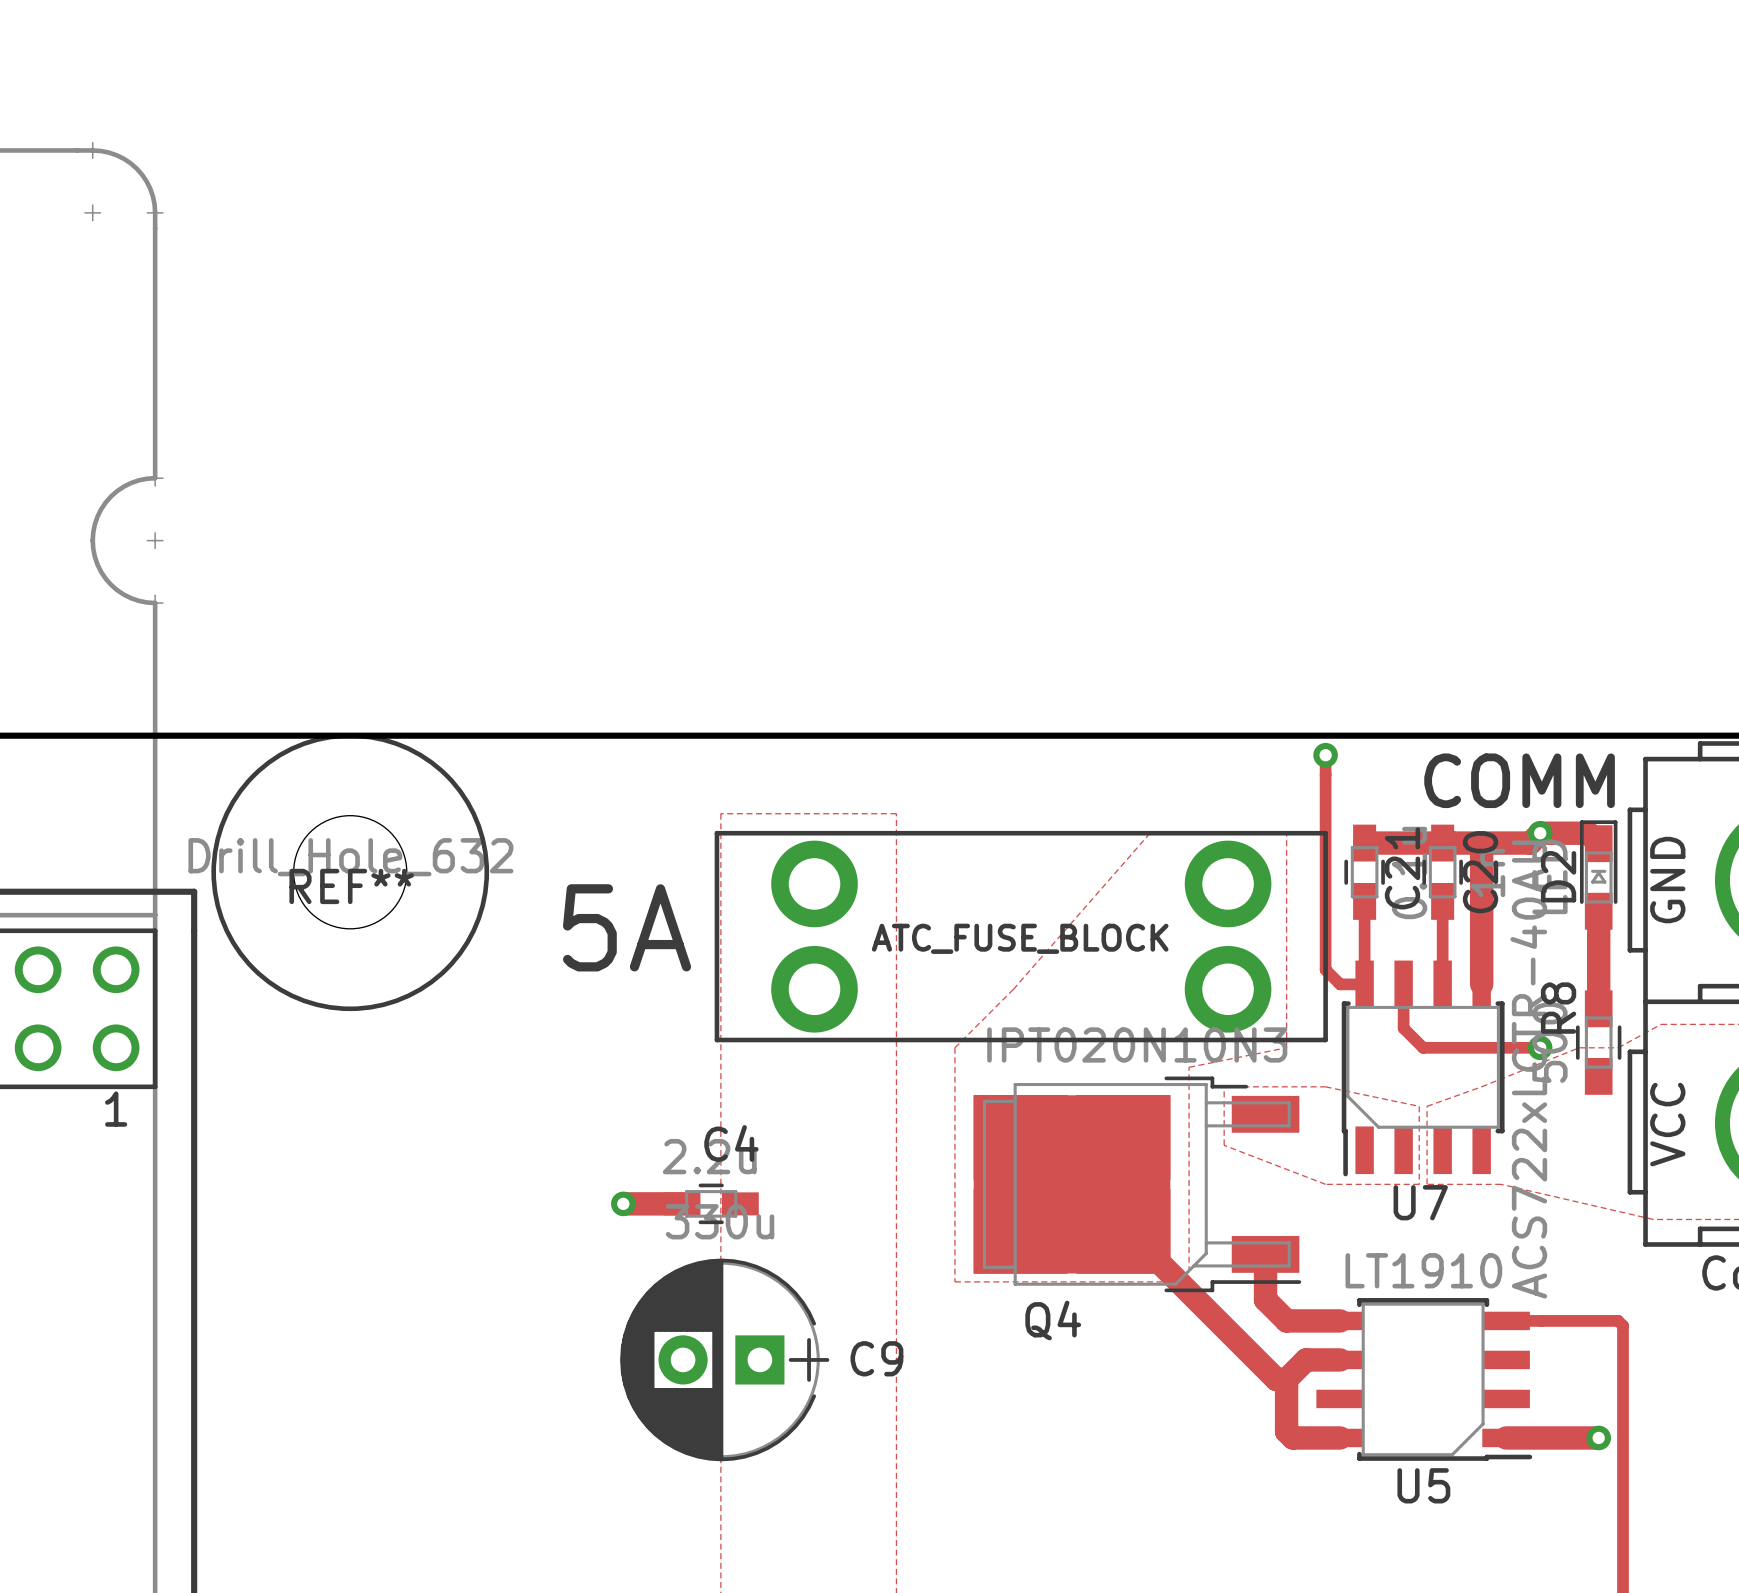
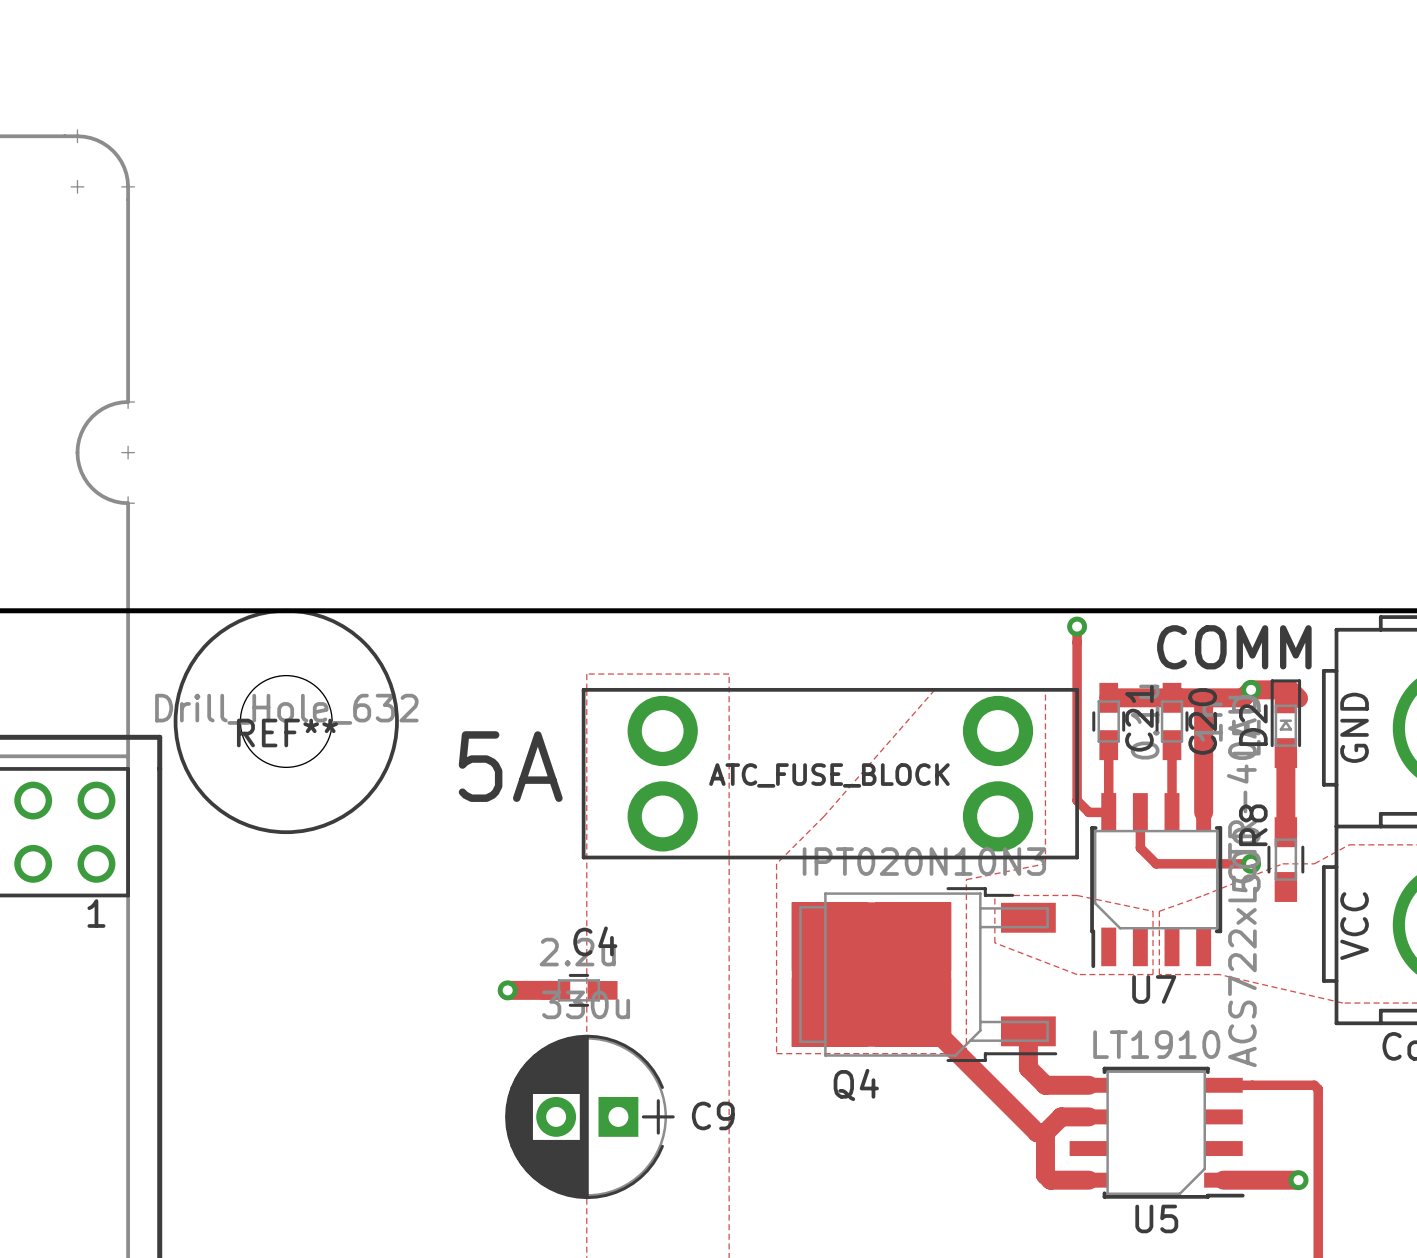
D2 position: (1598, 875) -> (1285, 723)
track: (1598, 911) (1598, 1008) -> (1285, 753) (1285, 832)
R8 name position: R8 (1558, 1008) -> R8 (1253, 825)
R8 position: (1598, 1042) -> (1285, 859)

